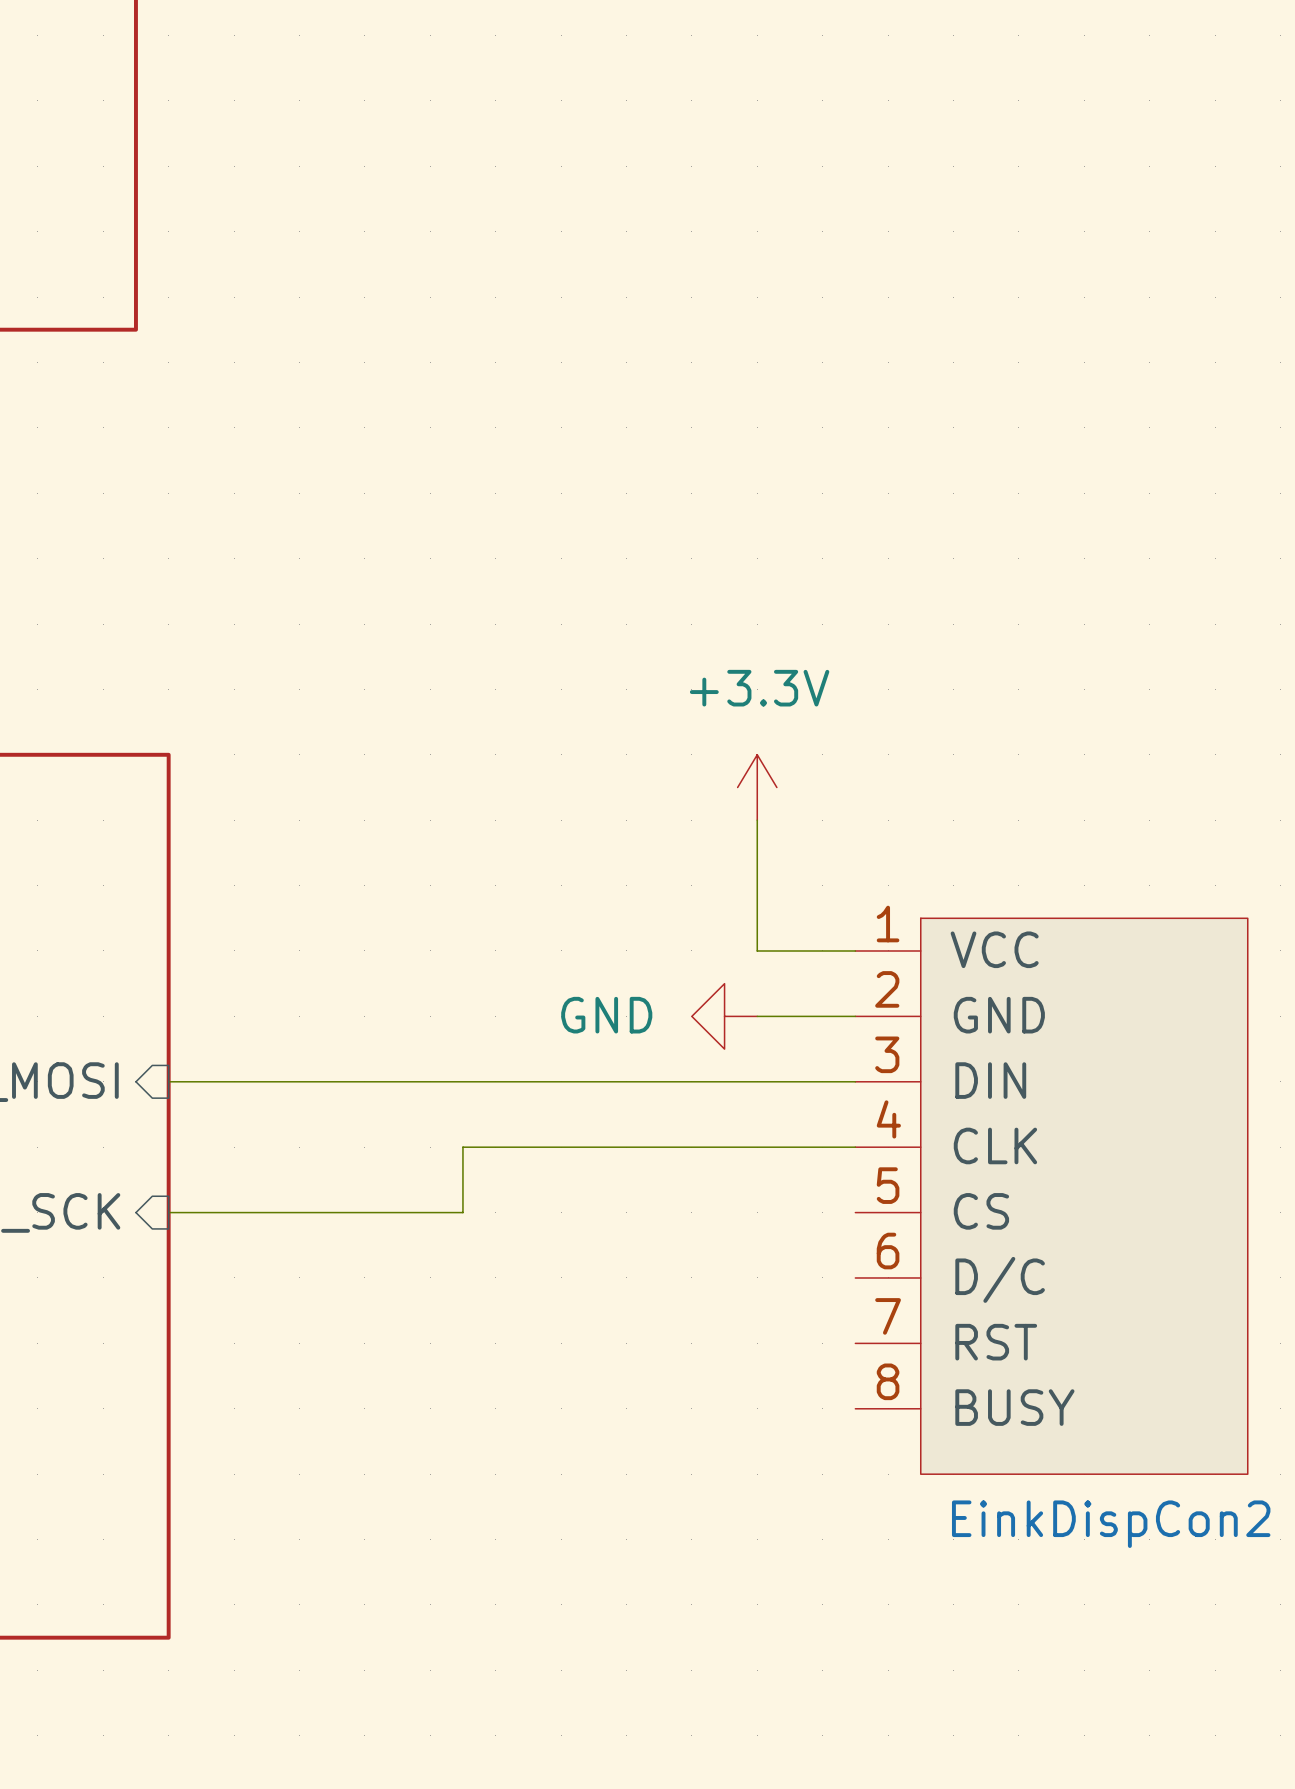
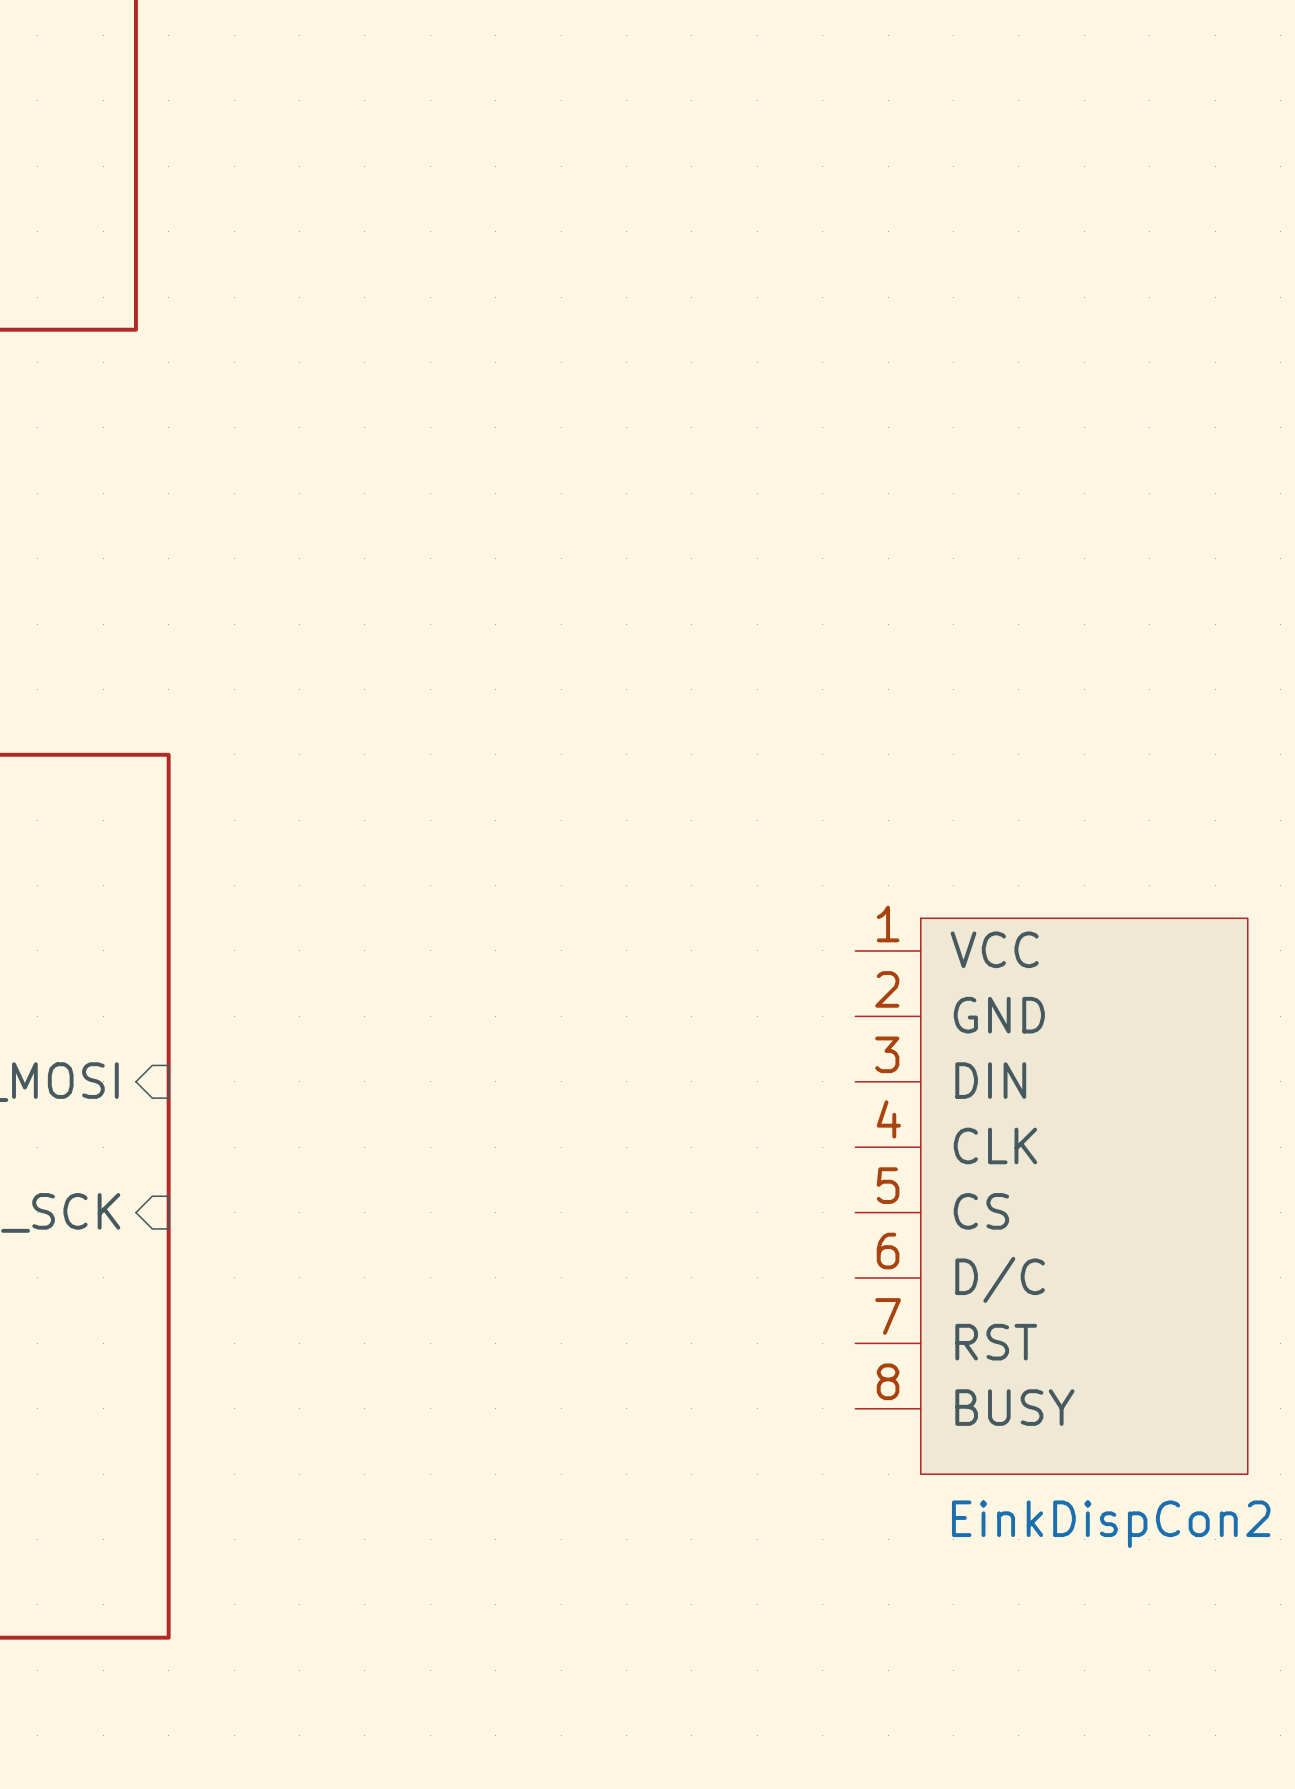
power symbol: +3.3V (757, 787) -> none
wire: (757, 820) (757, 950) (855, 950) -> none
power symbol: GND (724, 1016) -> none
wire: (757, 1016) (855, 1016) -> none
wire: (168, 1081) (855, 1081) -> none
wire: (855, 1147) (462, 1147) (462, 1212) (168, 1212) -> none

